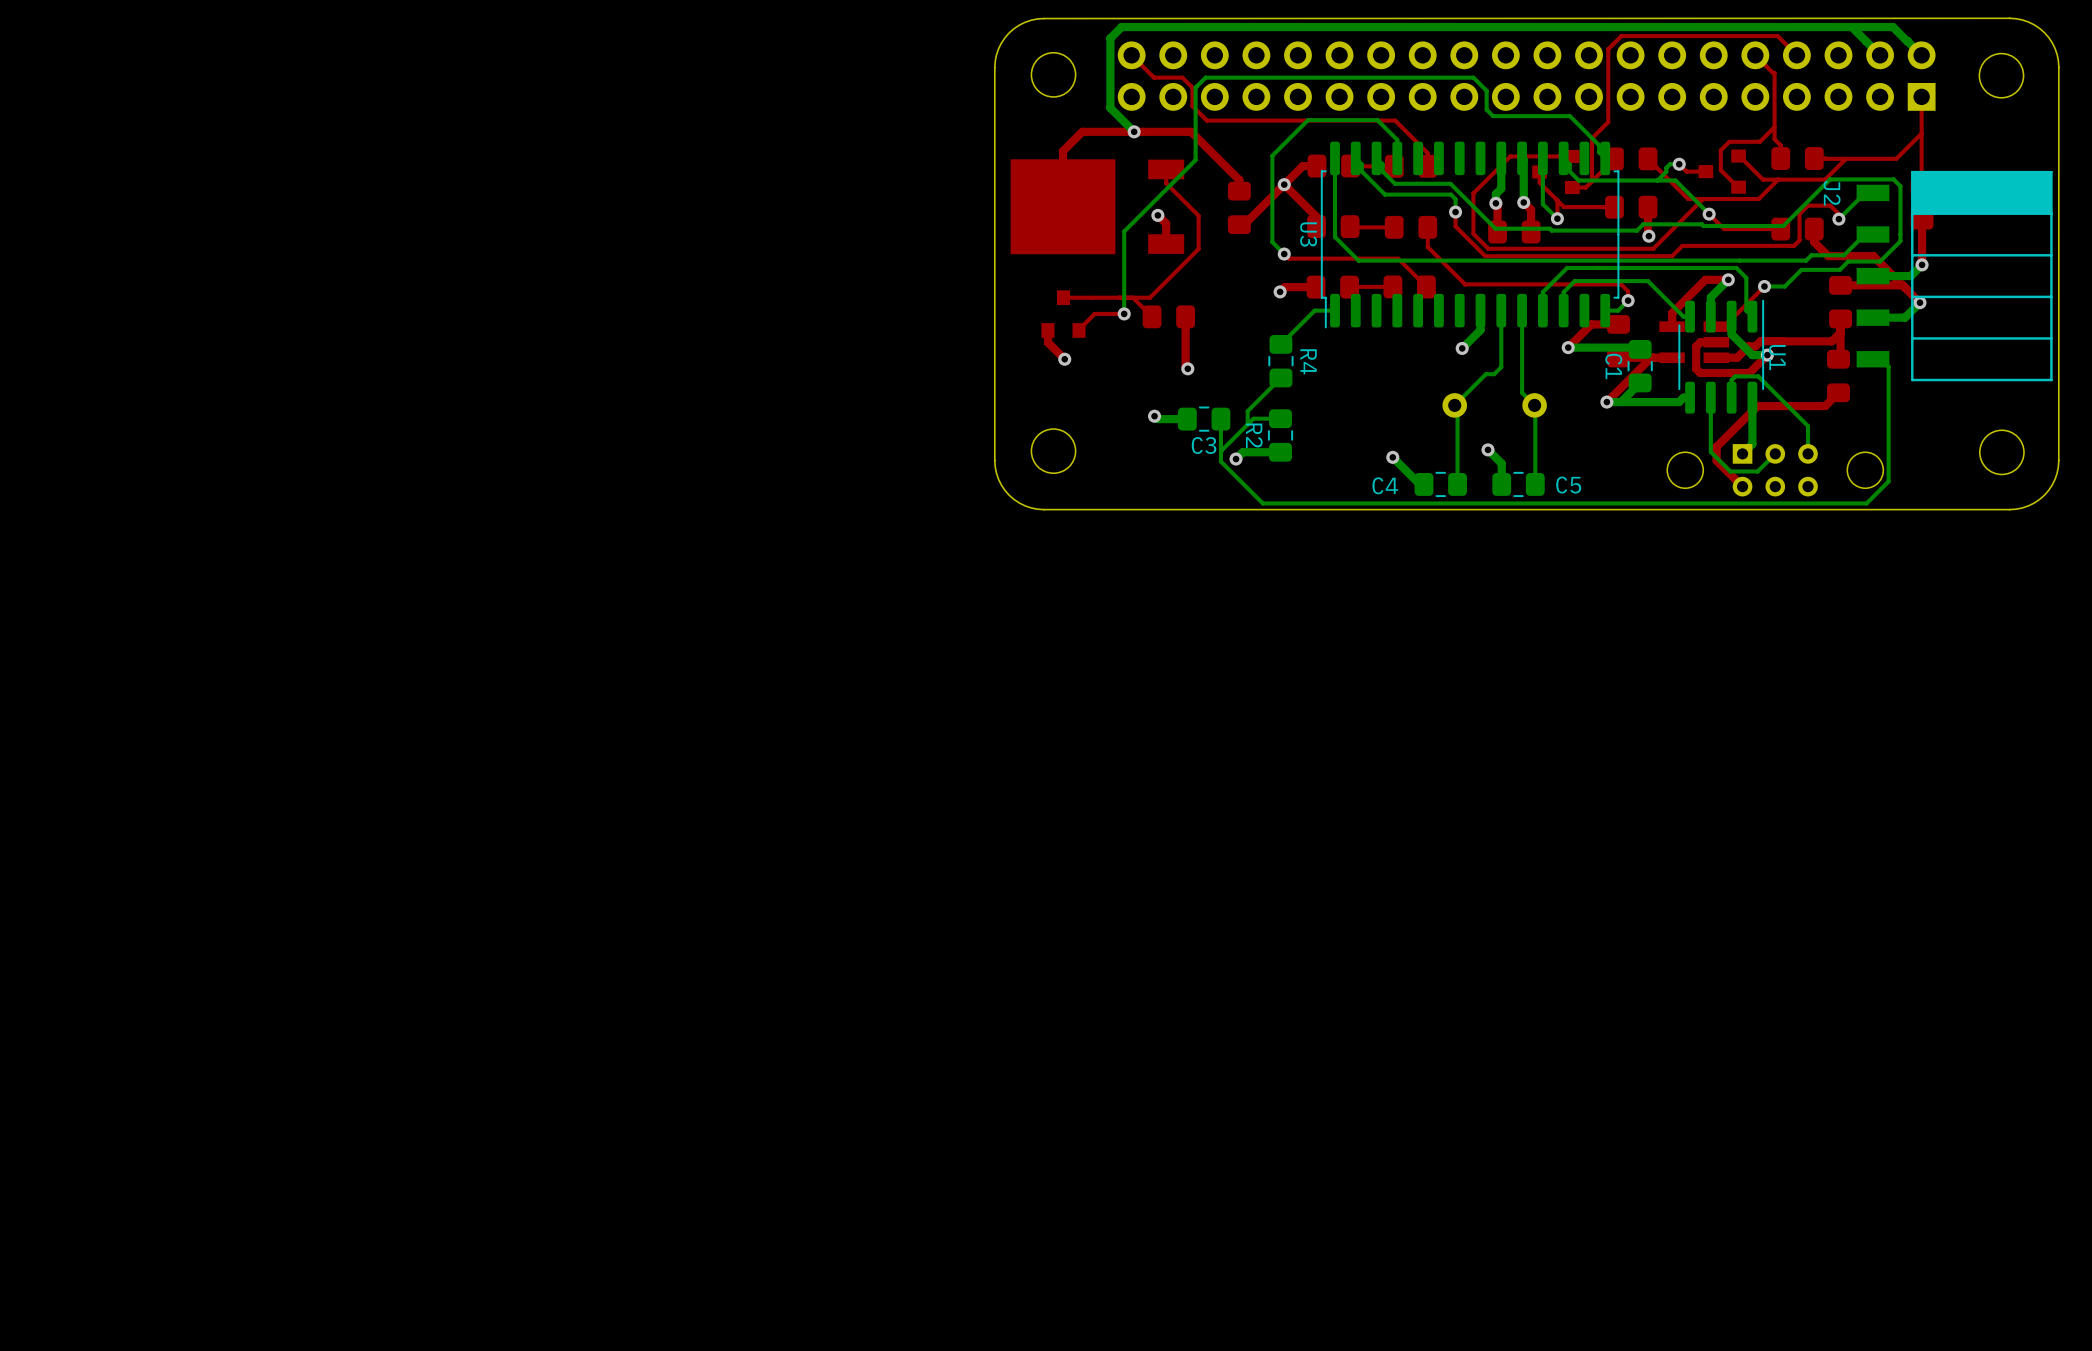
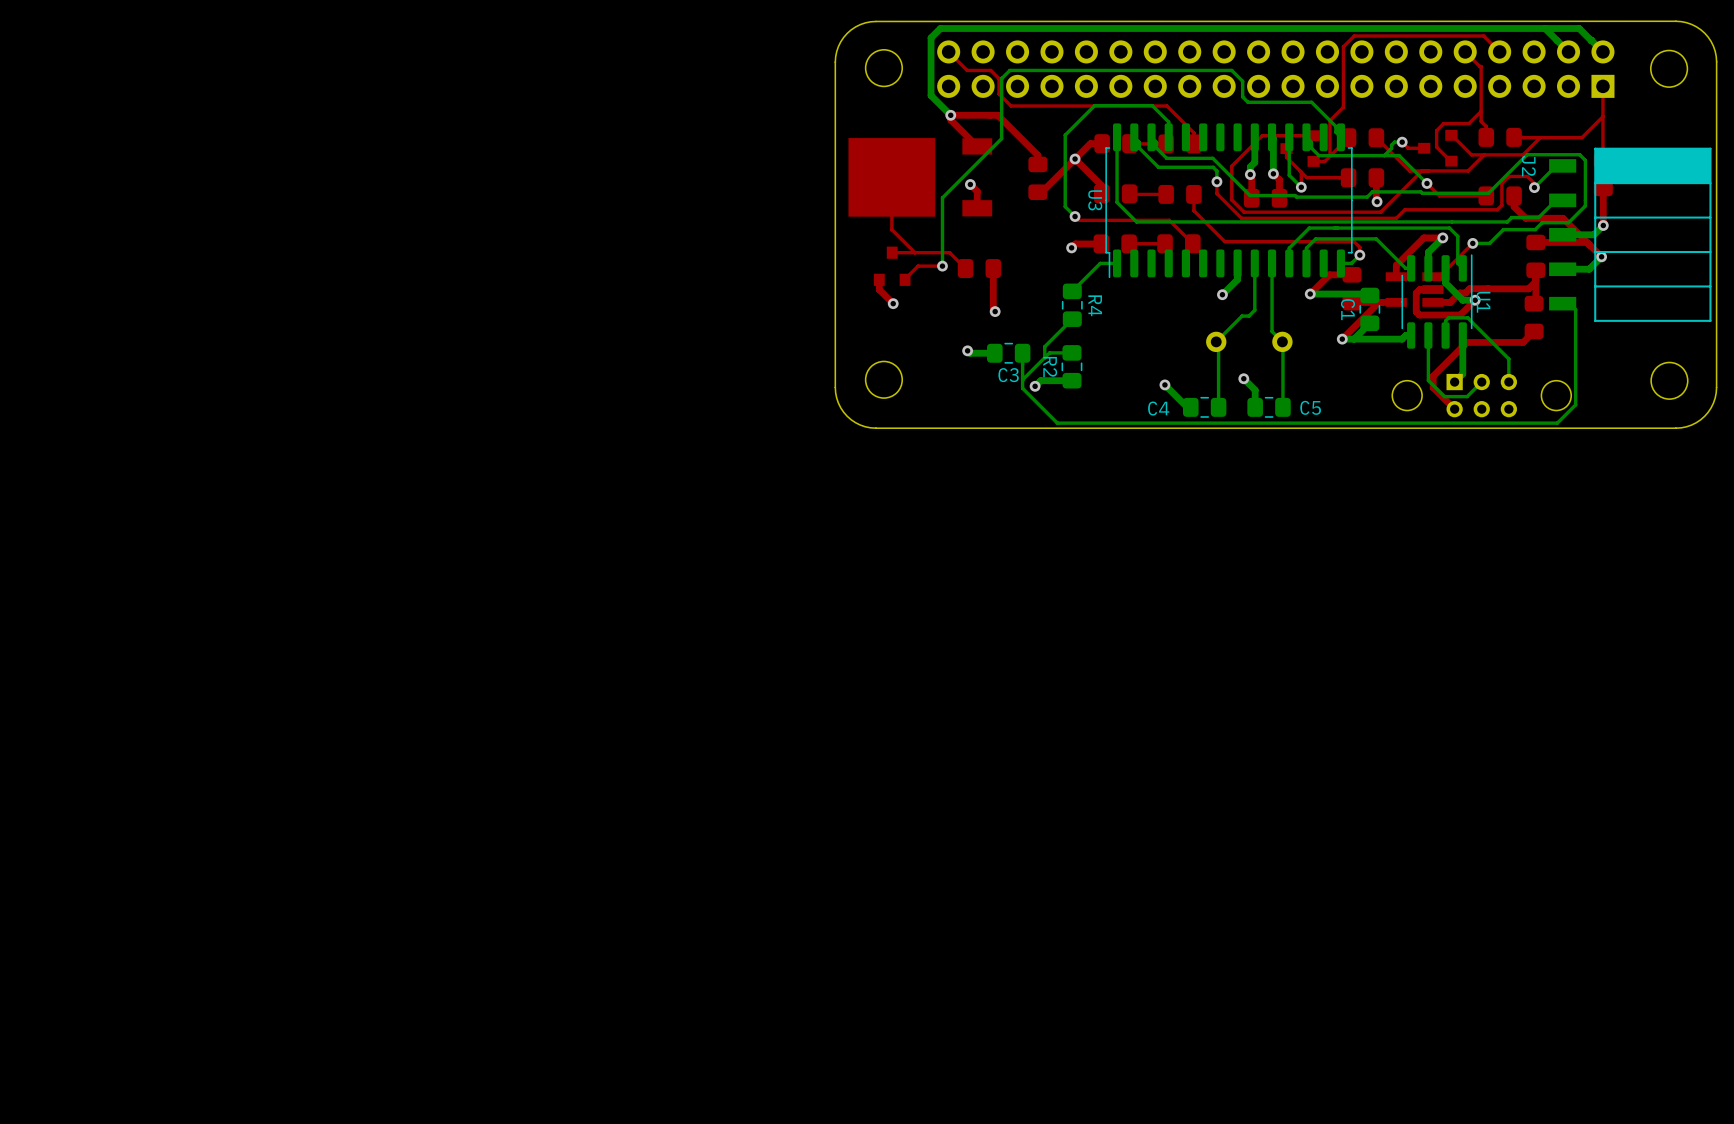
top track: (1134, 131) (1082, 131) (1063, 151) (1063, 206) (1067, 206) -> (950, 115) (950, 119) (977, 146)
top track: (1166, 169) (1166, 183) (1198, 215) (1198, 249) (1149, 297) (1132, 297) -> none
top track: none -> (891, 177) (891, 229) (914, 252)

